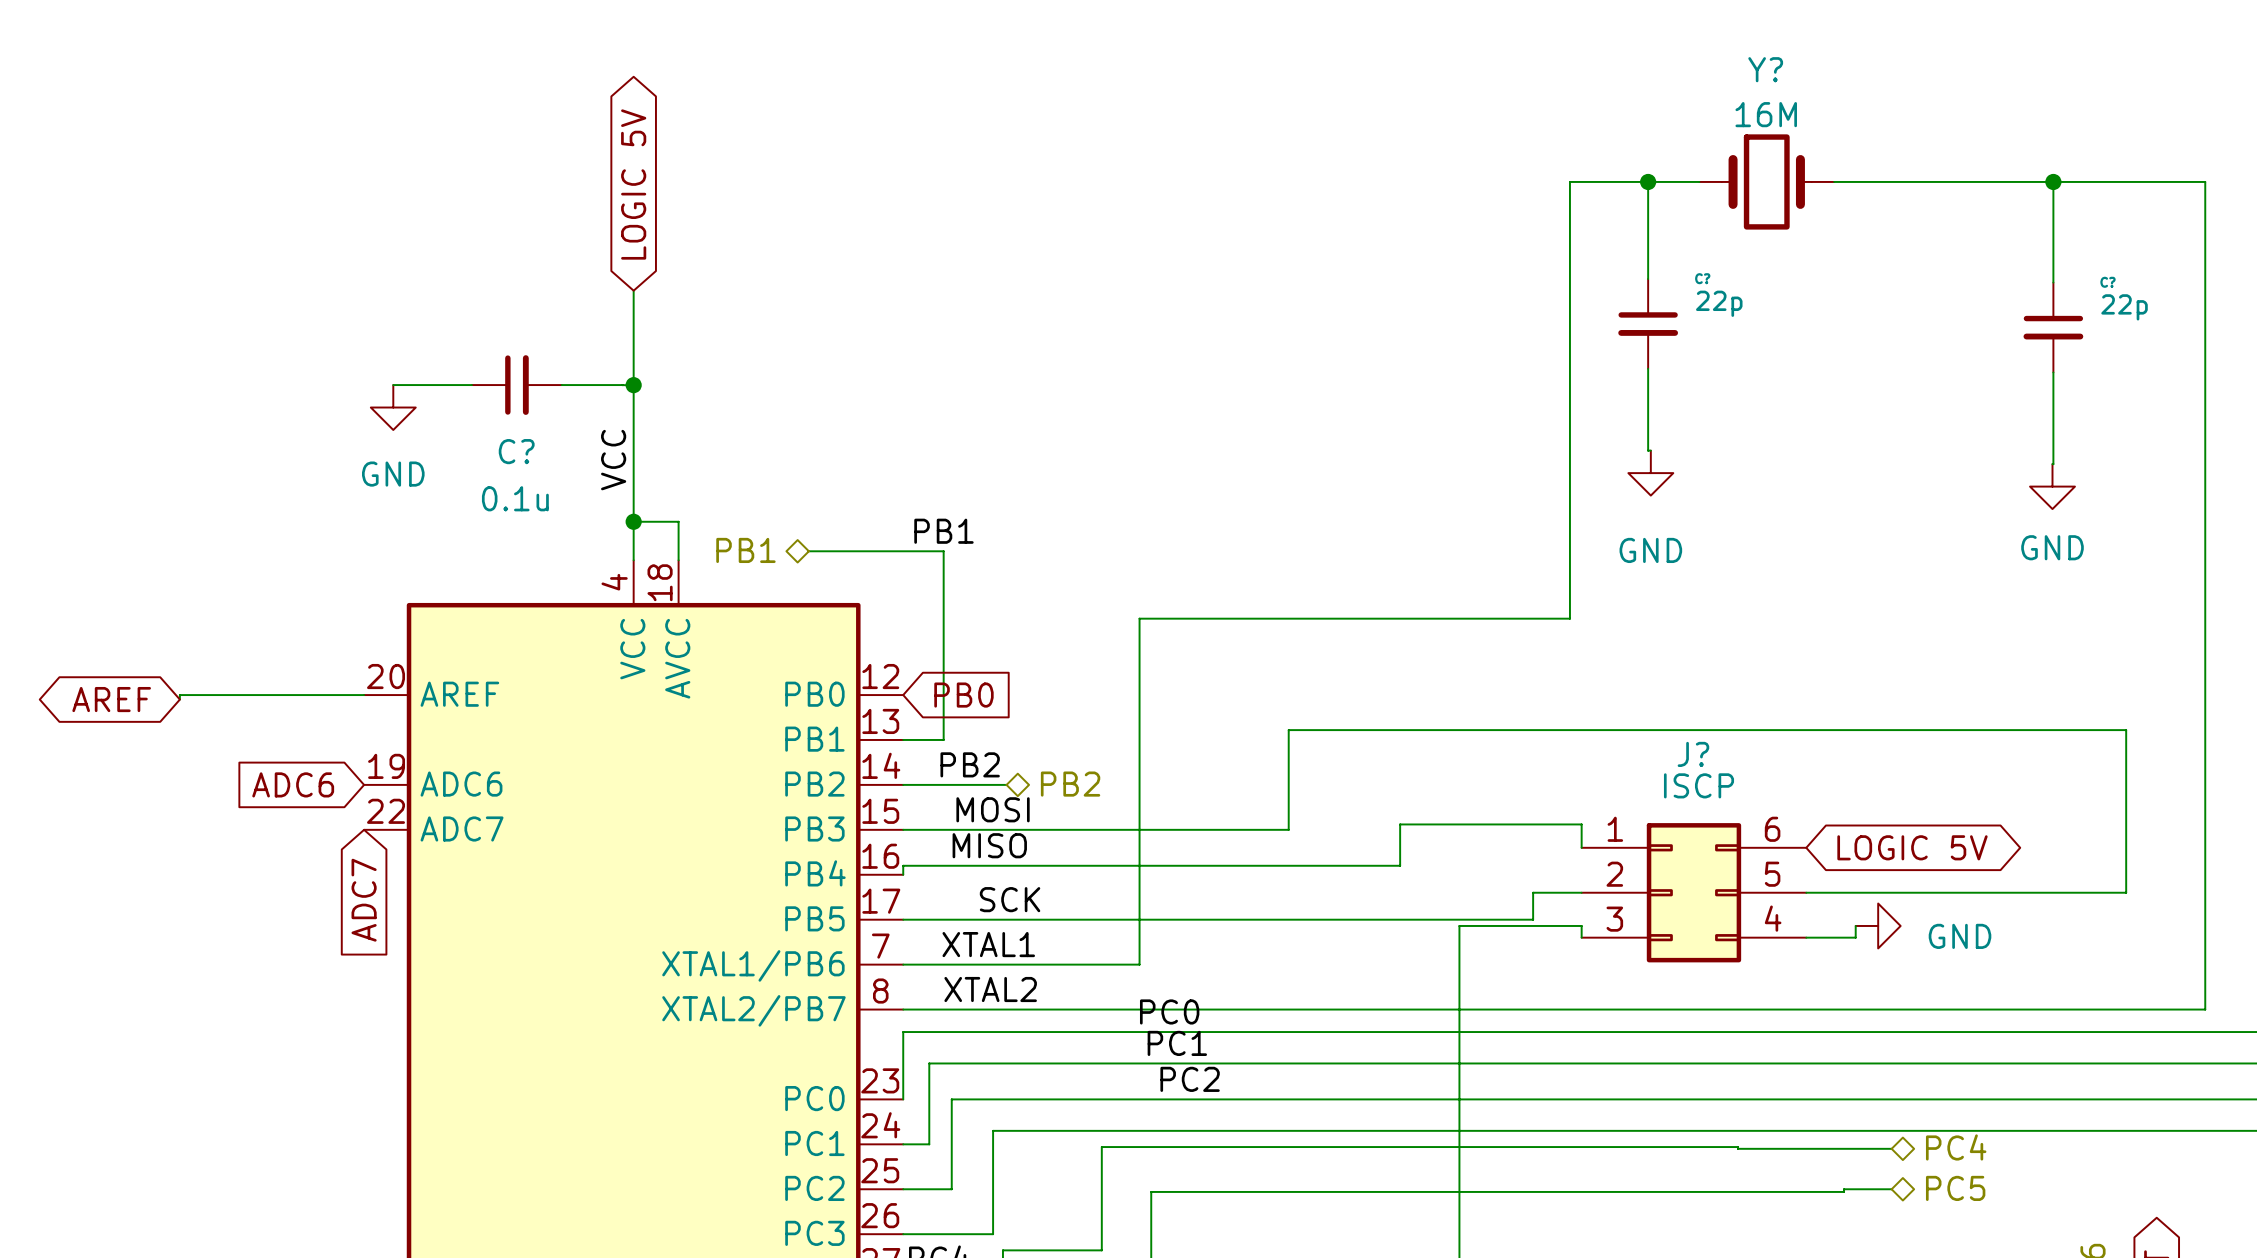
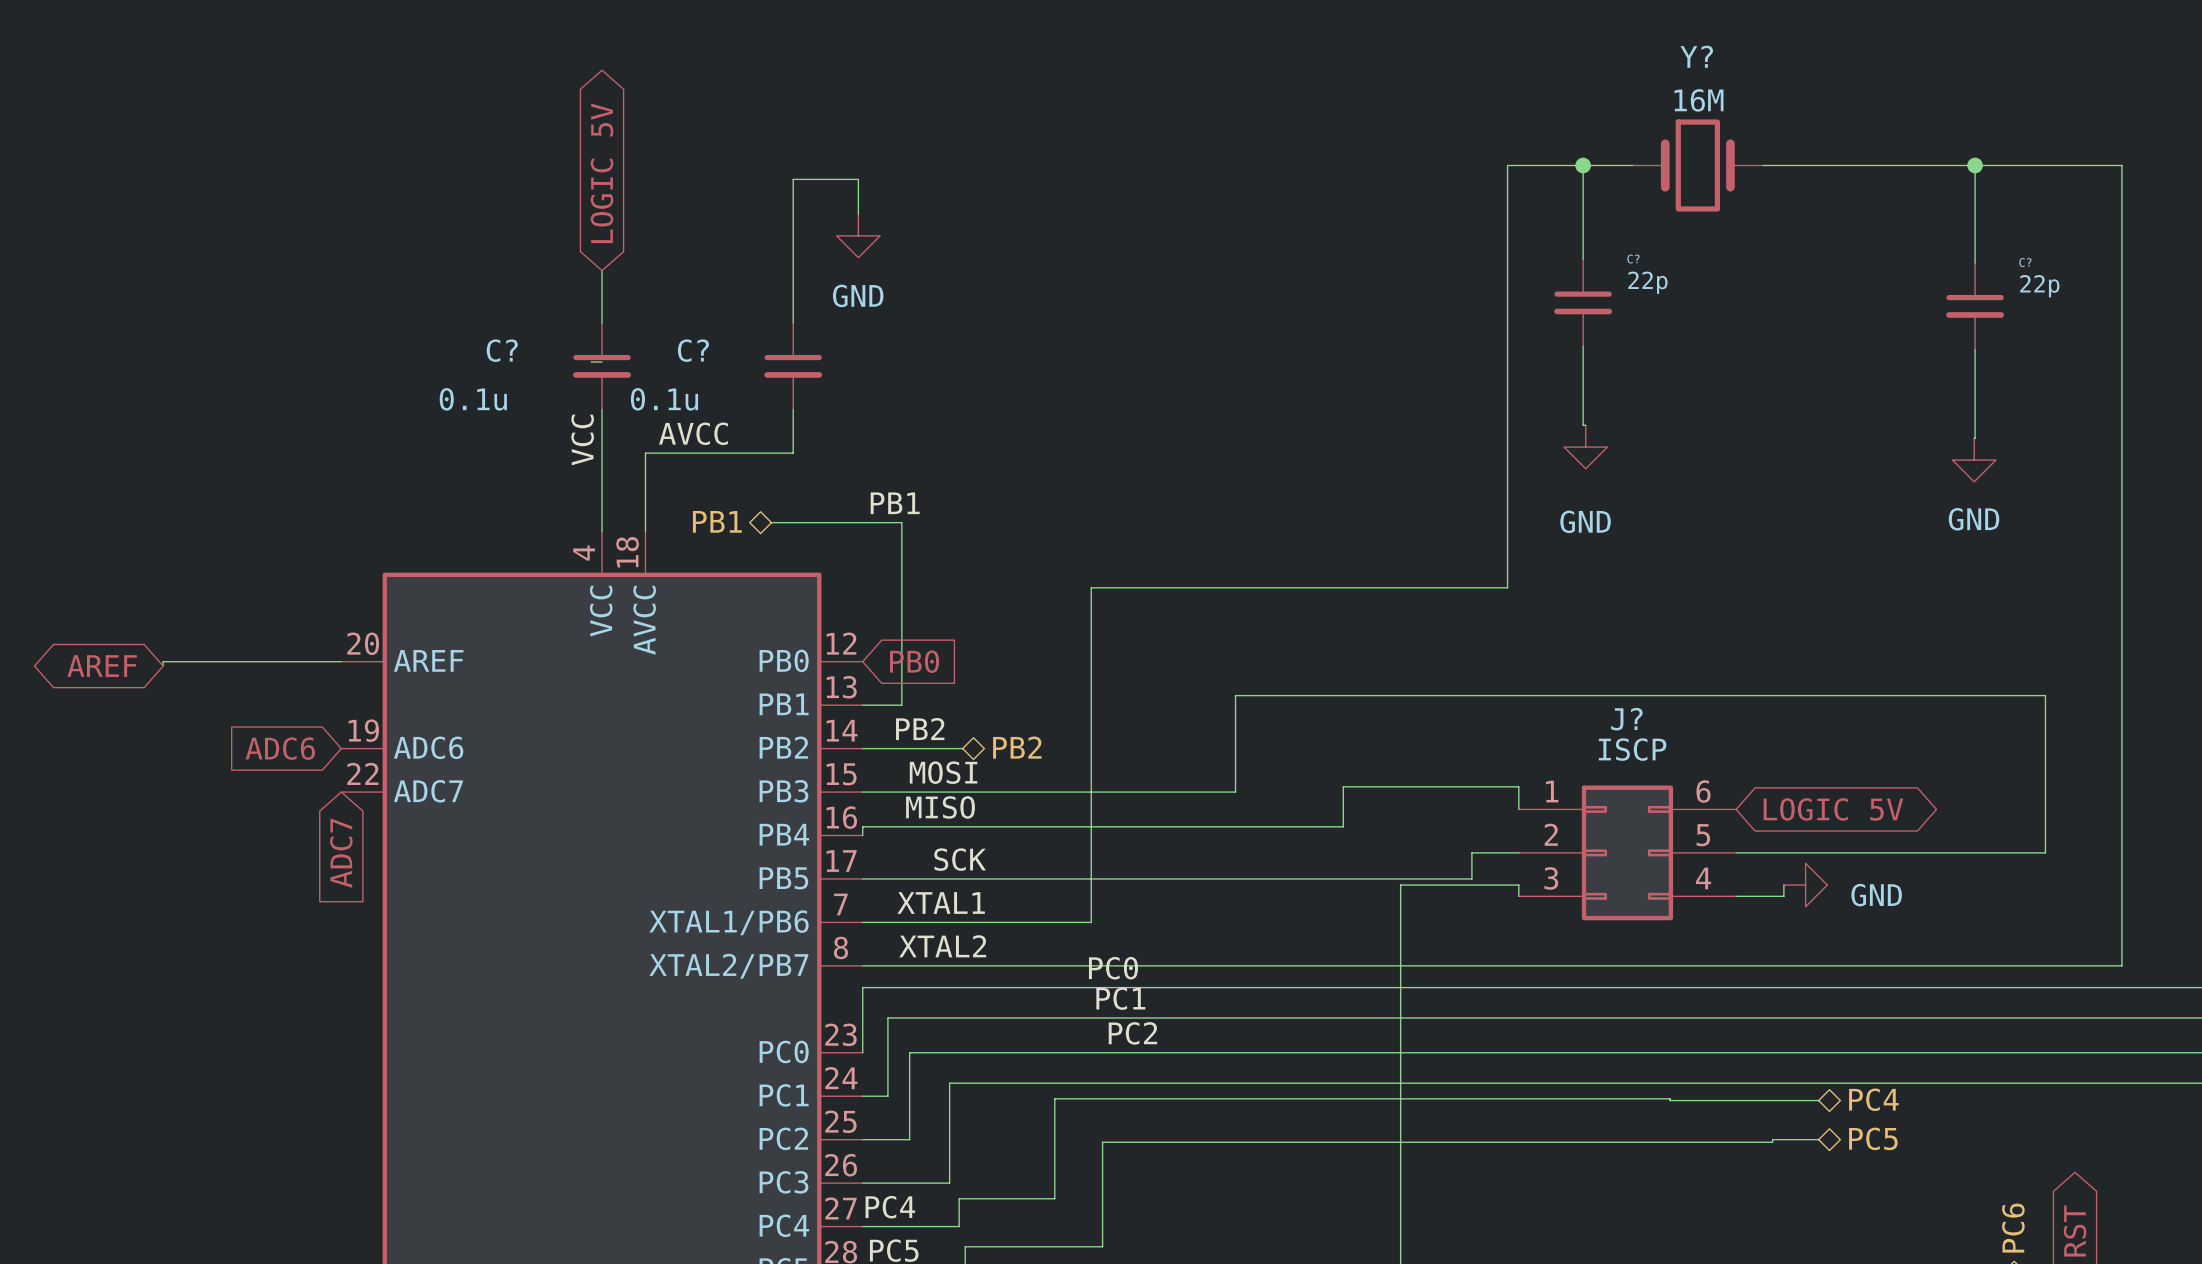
wire: none -> (858, 214) (858, 179) (793, 179) (793, 322)
power symbol: none -> GND (858, 235)
wire: (393, 385) (471, 385) -> none
C? rotation: 0° (516, 385) -> 90° clockwise (602, 366)
C? position: (516, 385) -> (602, 366)
wire: (561, 385) (622, 385) -> none
junction: (633, 385) -> none
C?: none -> 0.1u (793, 366)
power symbol: GND (393, 407) -> none
label: none -> AVCC (693, 433)
C? value position: 0.1u (515, 498) -> 0.1u (473, 399)
wire: (633, 521) (678, 521) -> (793, 409) (793, 453) (645, 453) (645, 494)
junction: (633, 521) -> none

